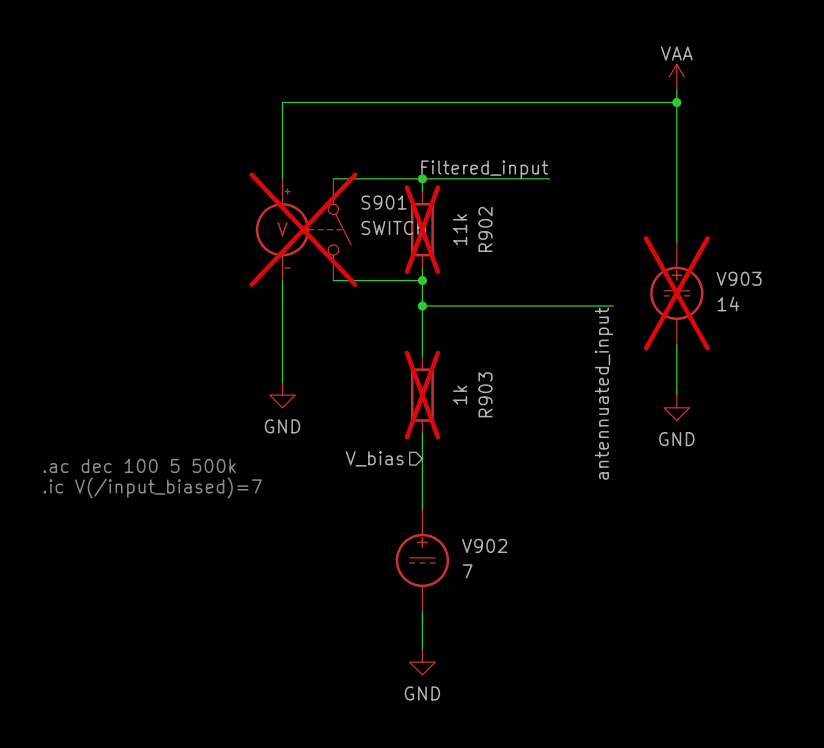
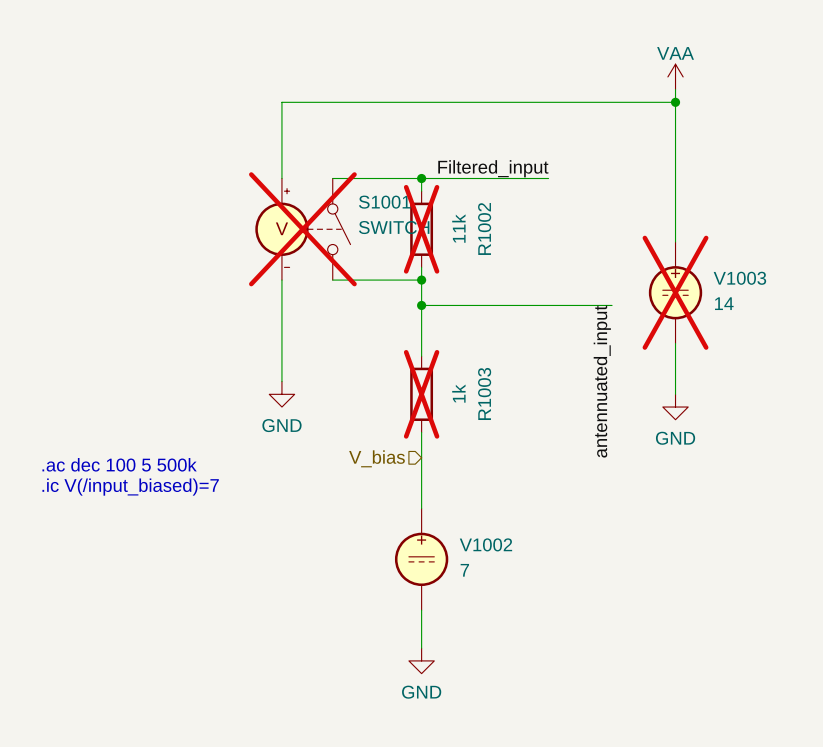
S901 name: S901 (384, 202) -> S1001 (384, 202)
R902 name: R902 (485, 229) -> R1002 (484, 228)
V903 name: V903 (739, 278) -> V1003 (739, 278)
R903 name: R903 (485, 394) -> R1003 (484, 393)
V902 name: V902 (484, 545) -> V1002 (485, 544)

